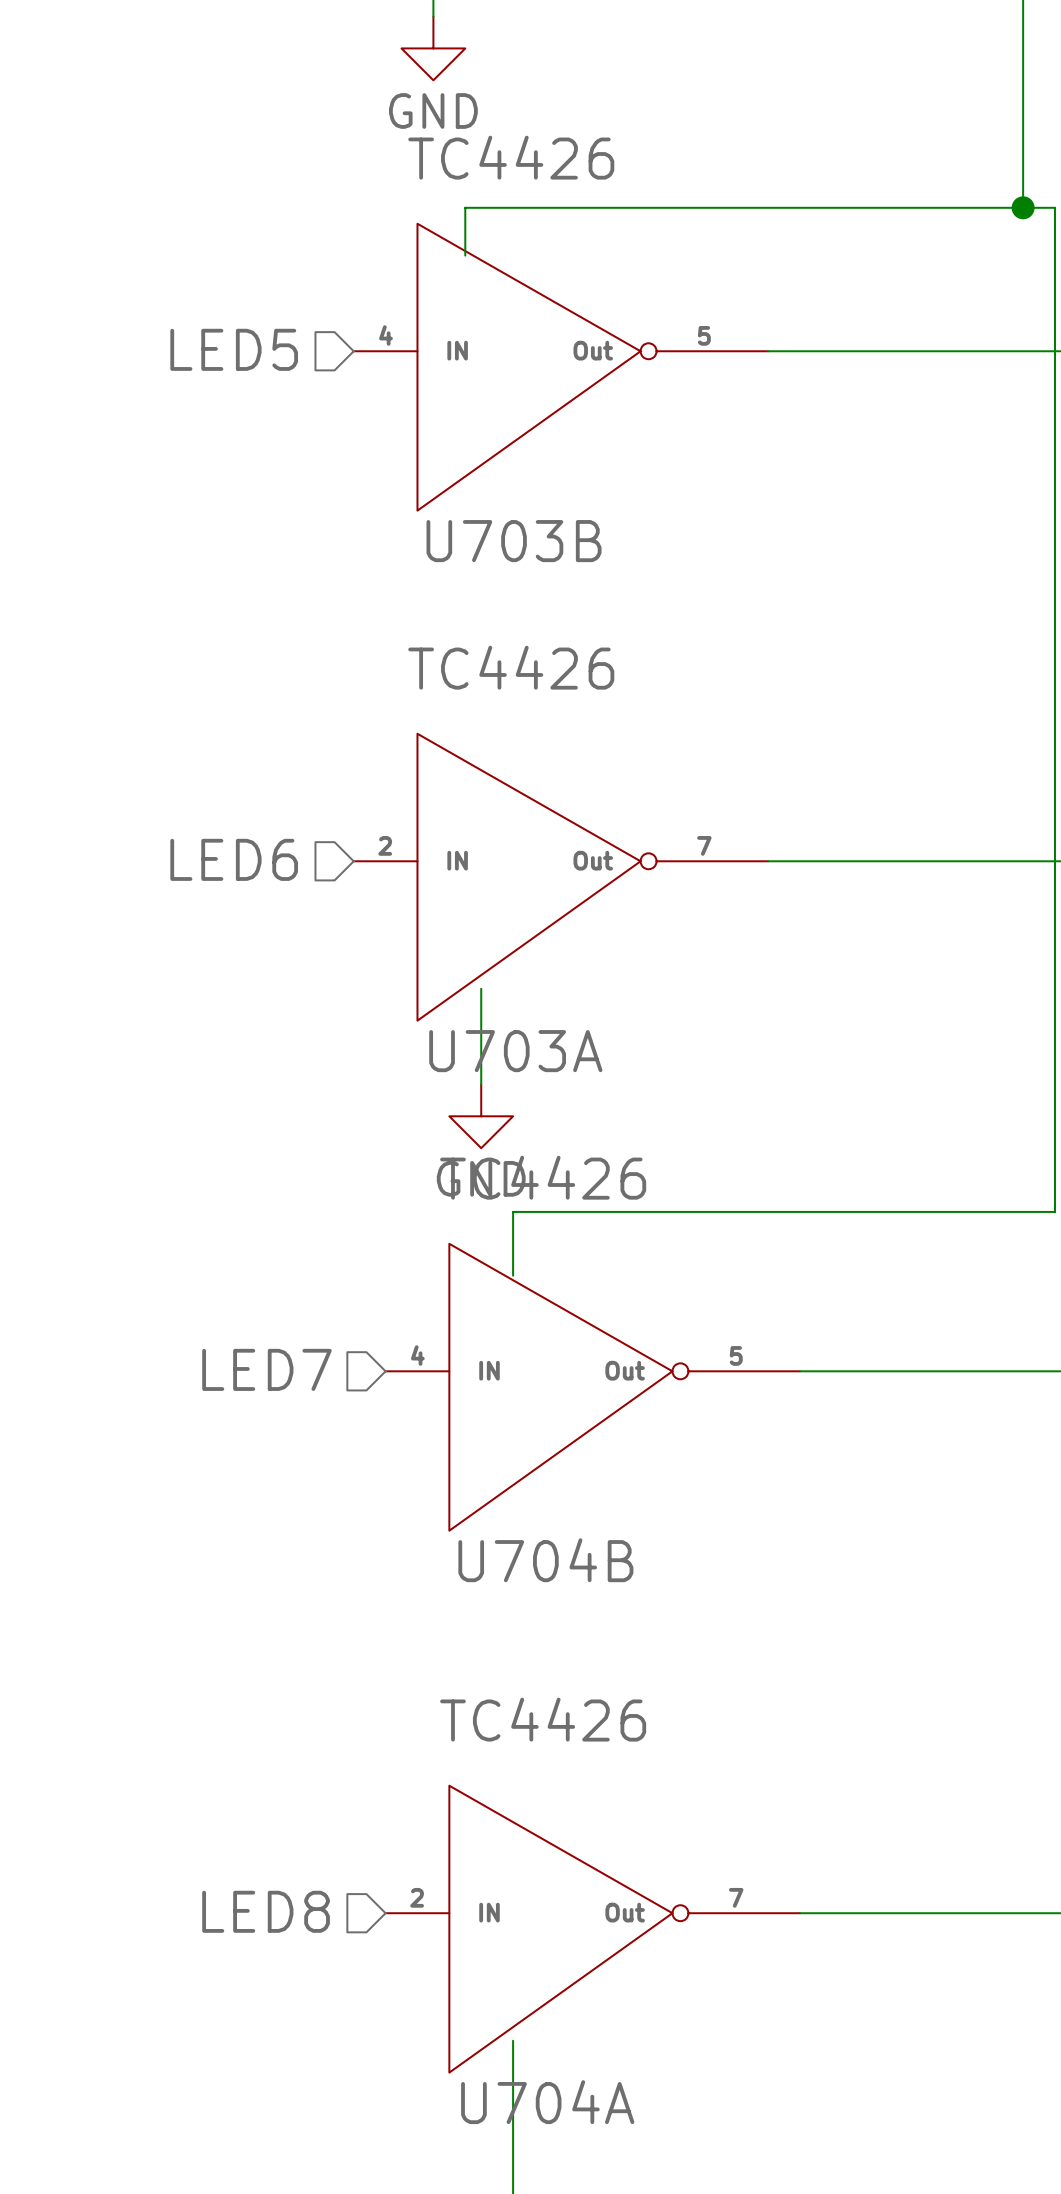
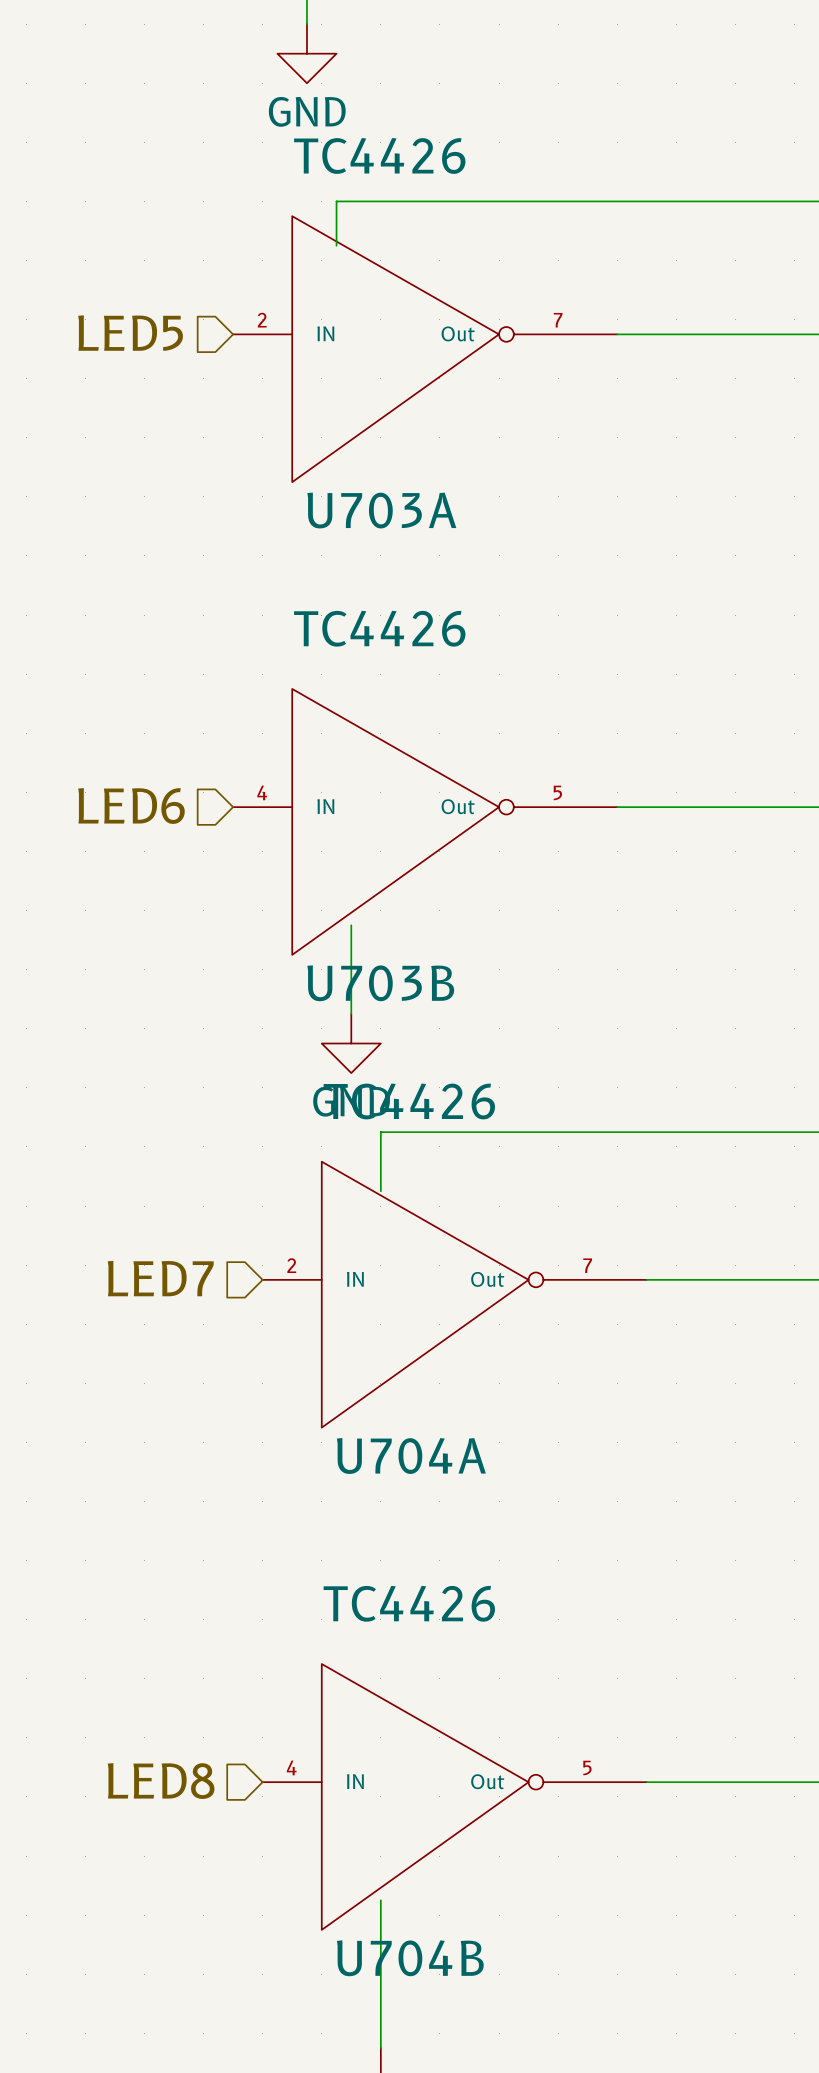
U703B position: (560, 367) -> (425, 821)
U703A position: (560, 877) -> (425, 349)
U704B position: (592, 1387) -> (454, 1796)
U704A position: (592, 1929) -> (454, 1294)

